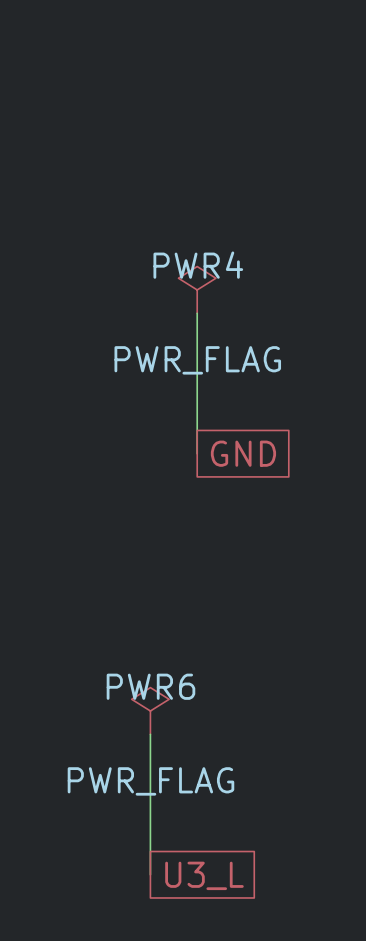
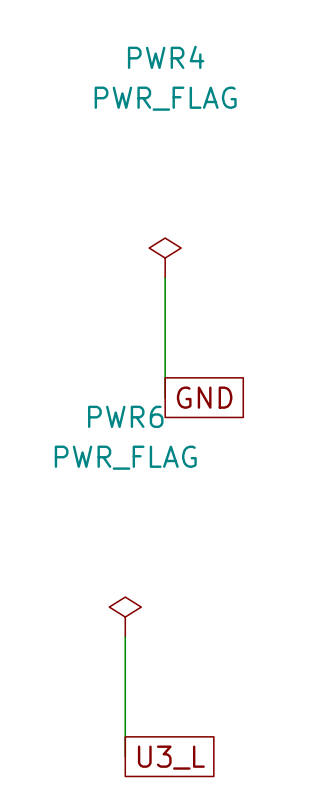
PWR4 name position: PWR4 (198, 265) -> PWR4 (166, 57)
PWR4 text position: PWR_FLAG (197, 360) -> PWR_FLAG (165, 98)
PWR6 name position: PWR6 (150, 686) -> PWR6 (125, 416)
PWR6 text position: PWR_FLAG (150, 781) -> PWR_FLAG (125, 457)

